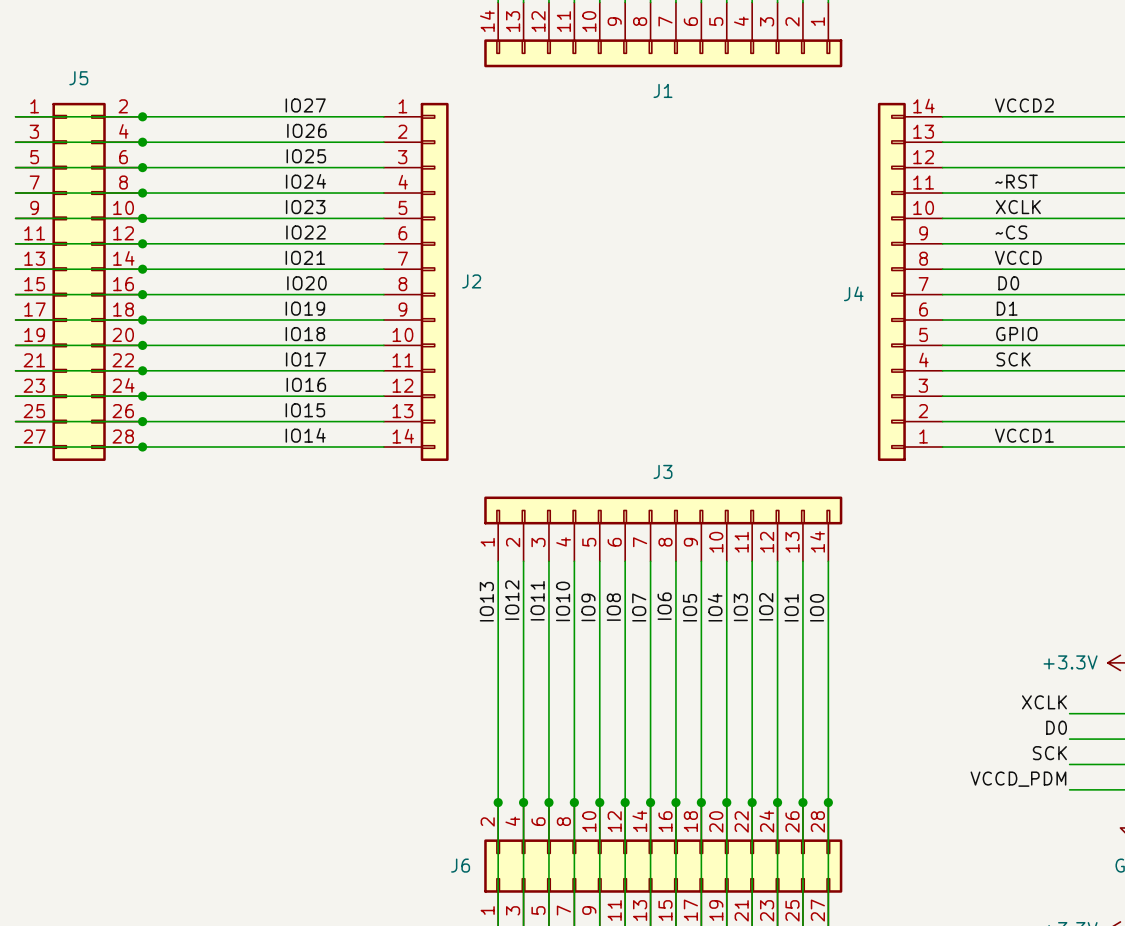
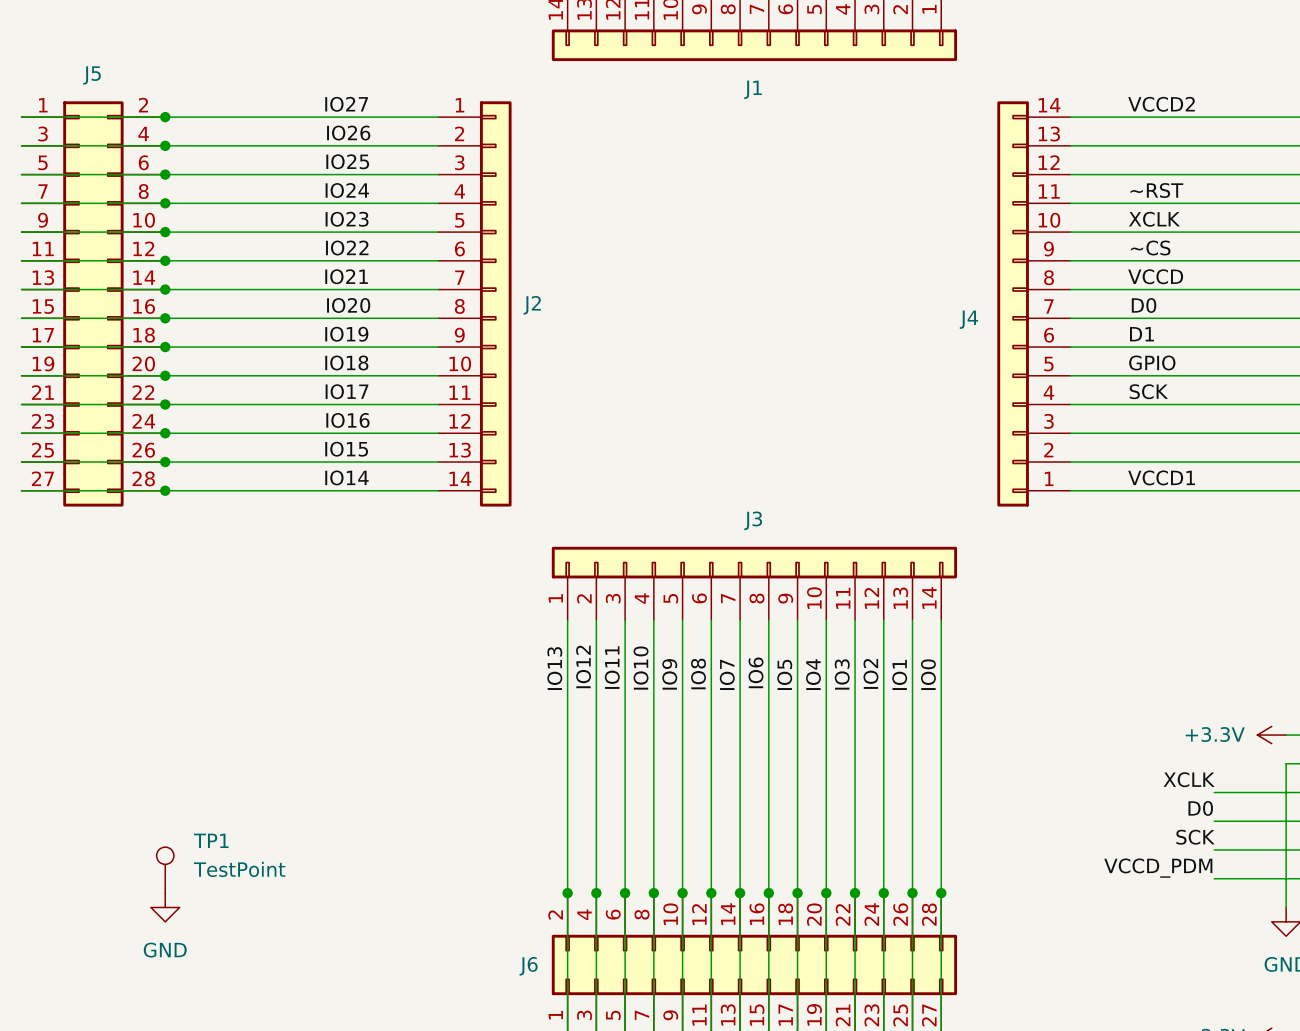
TP1: none -> TestPoint (165, 870)
power symbol: none -> GND (165, 907)

